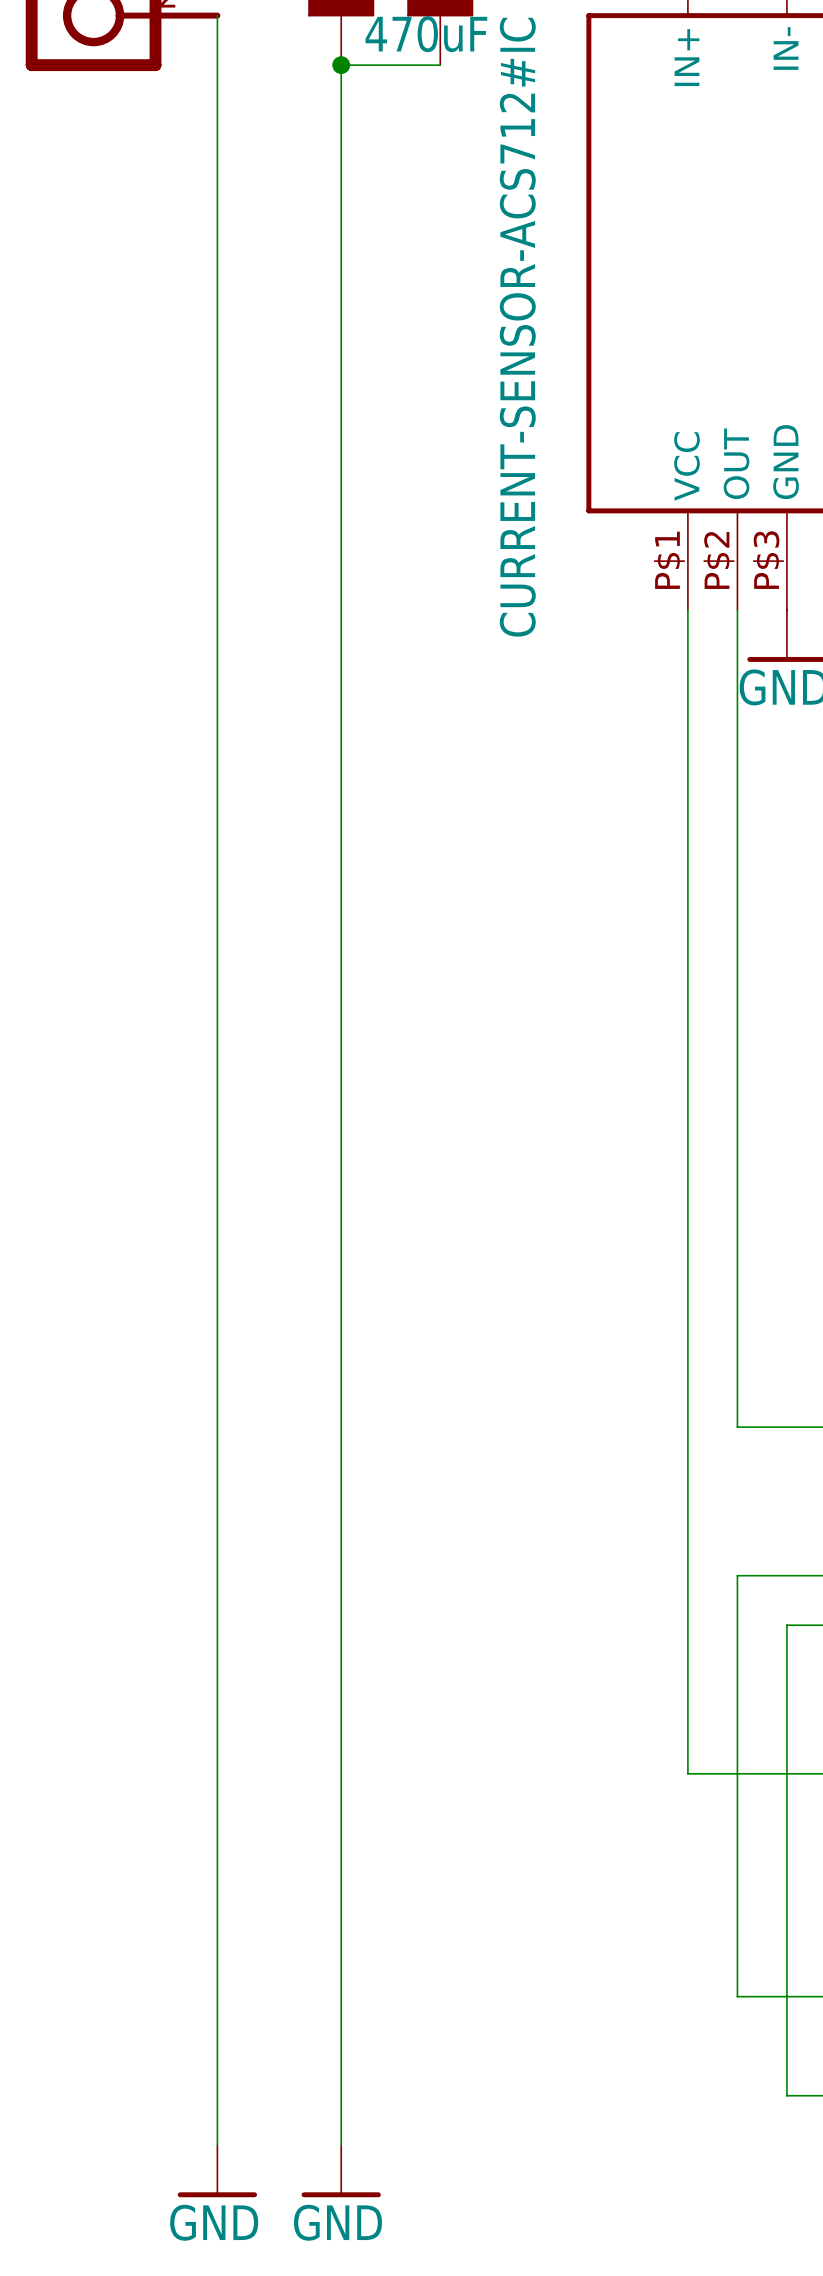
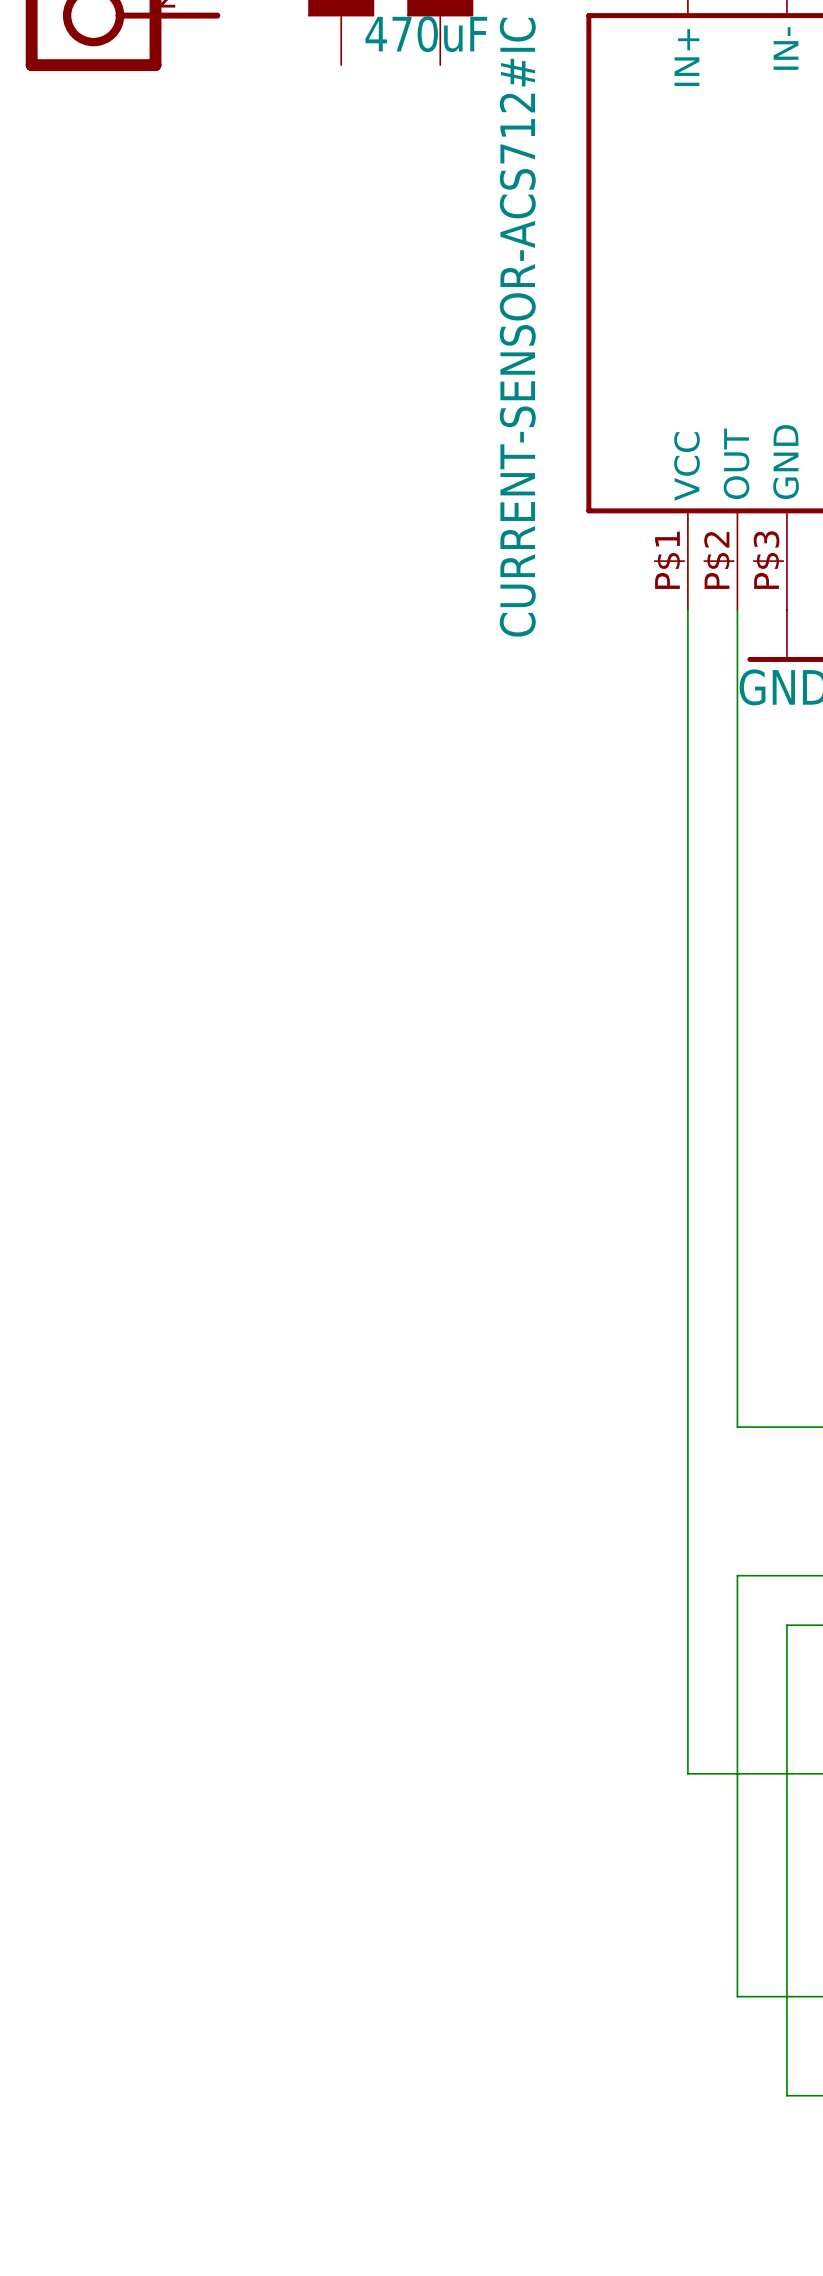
wire: (217, 15) (217, 2145) -> none
junction: (341, 65) -> none
wire: (440, 65) (341, 65) (341, 2145) -> none
power symbol: GND (217, 2171) -> none
power symbol: GND (341, 2171) -> none

